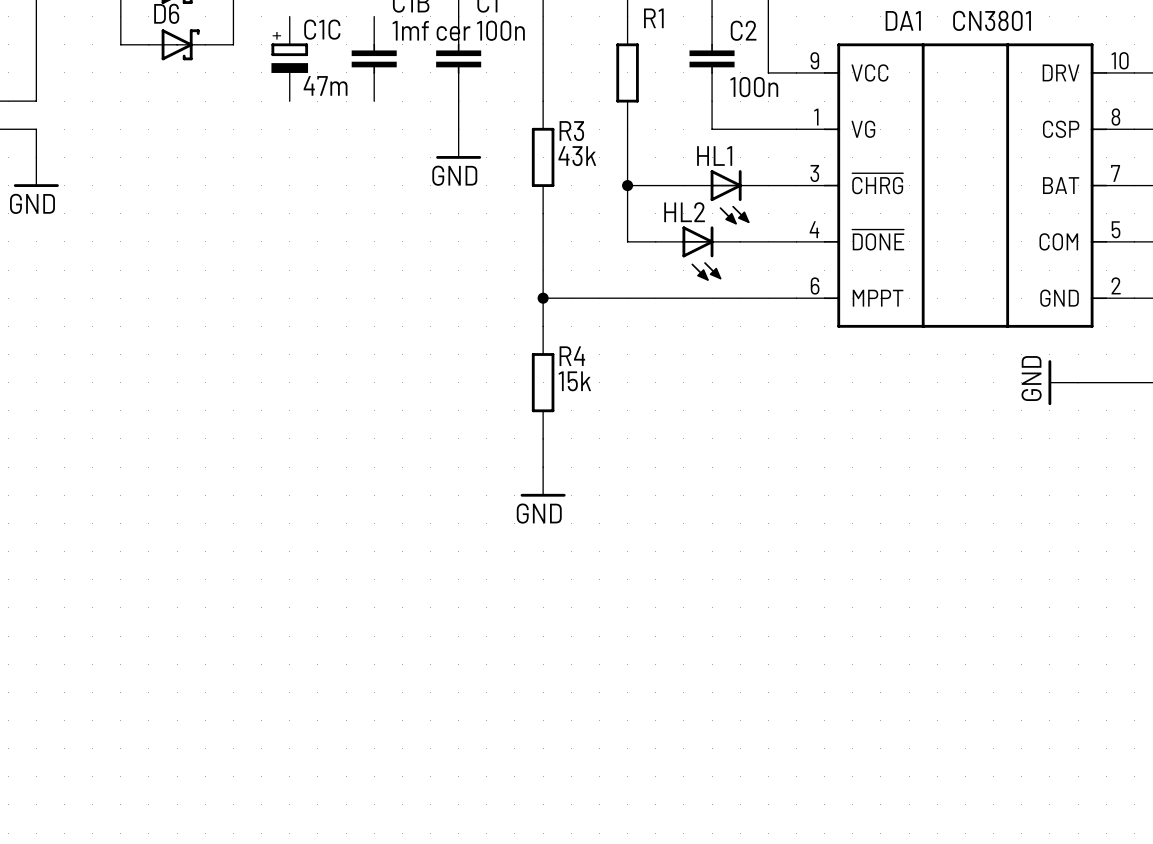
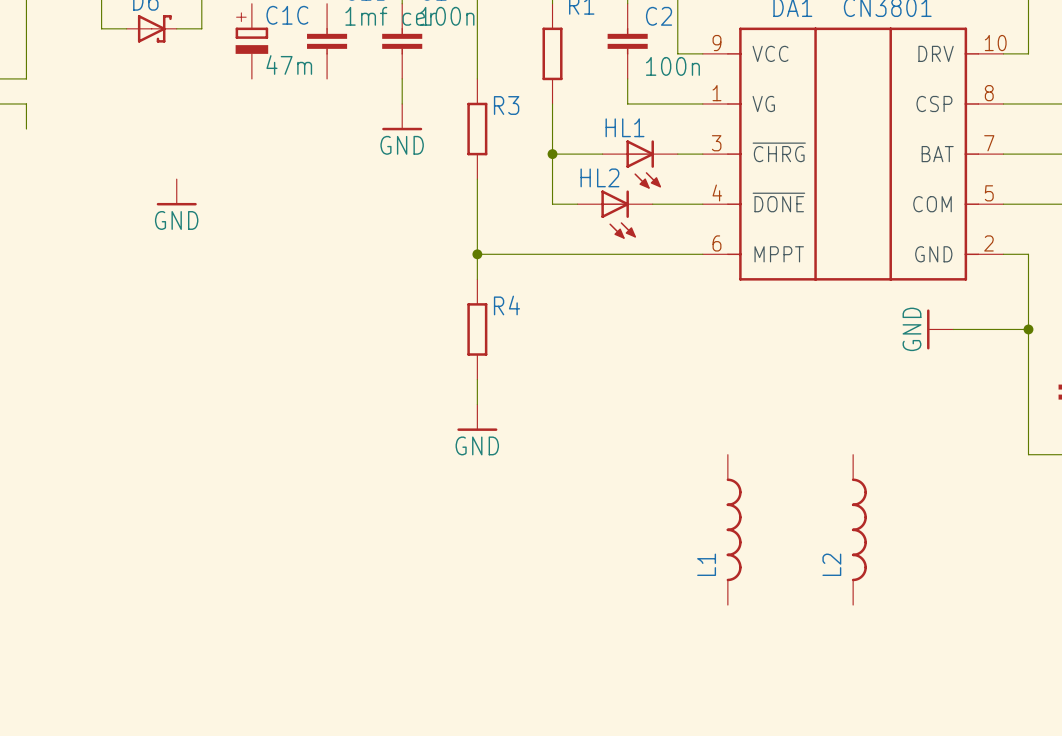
R3 value: 43k (577, 156) -> none
power symbol position: GND (36, 172) -> GND (176, 192)
R4 value: 15k (574, 381) -> none
L1: none -> (734, 529)
L2: none -> (859, 529)

